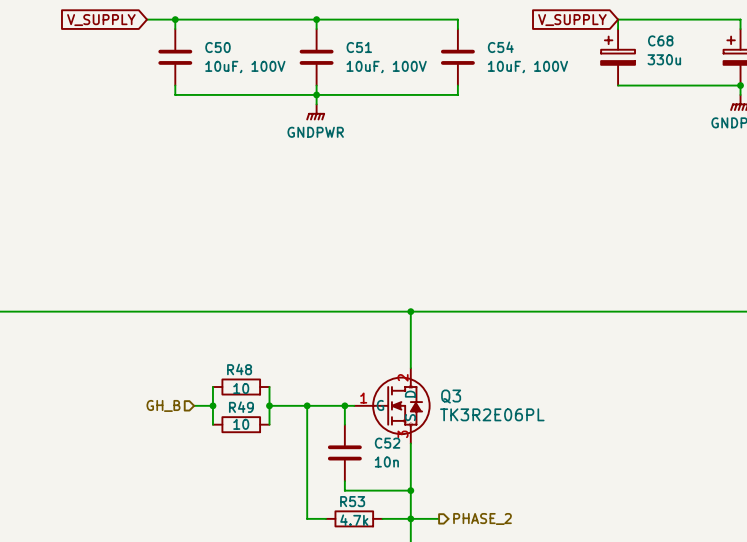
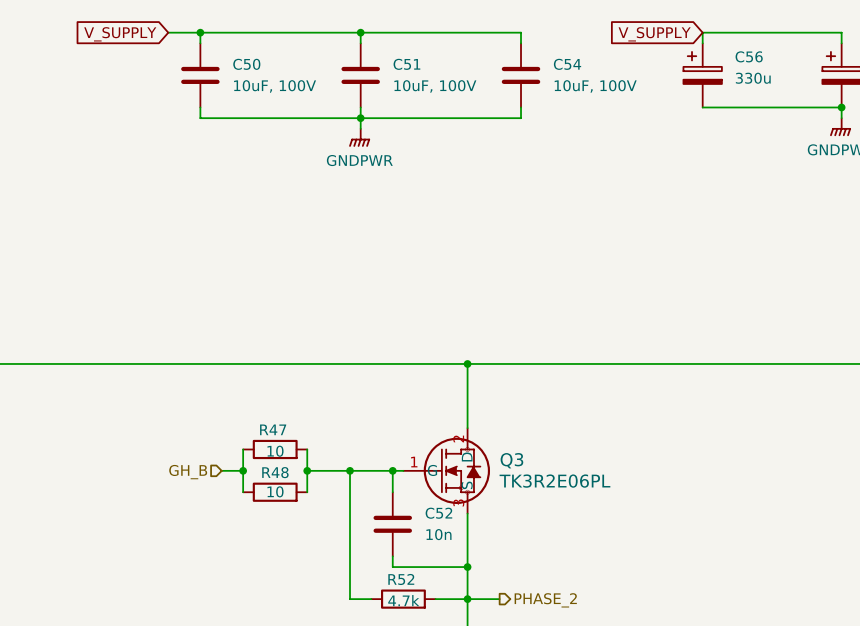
C68 name: C68 (660, 40) -> C56 (749, 56)
R48 name: R48 (239, 369) -> R47 (273, 429)
R49 name: R49 (241, 407) -> R48 (275, 472)
R53 name: R53 (352, 501) -> R52 (401, 579)

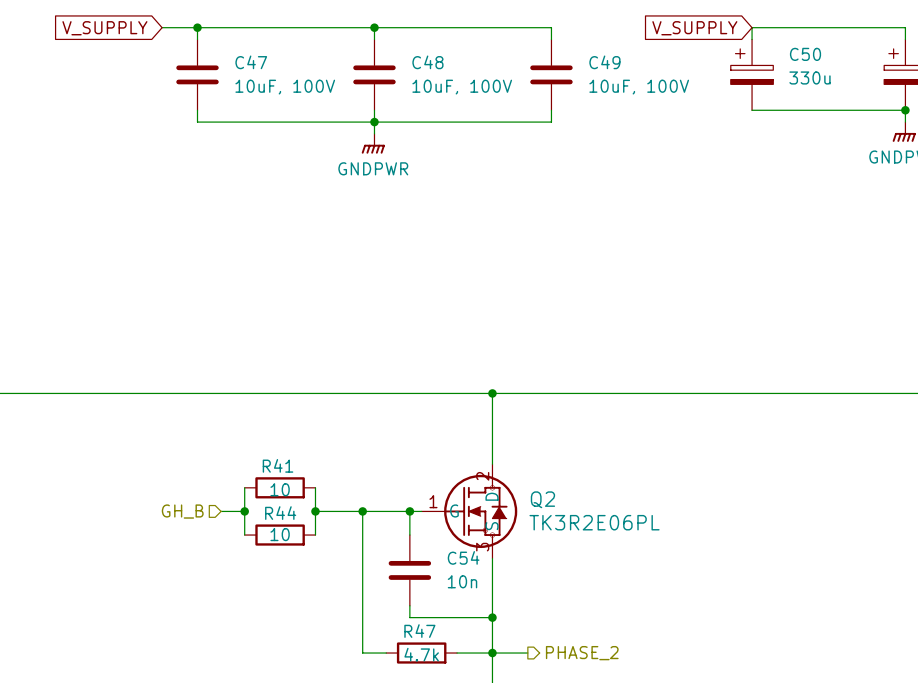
C56 name: C56 (749, 56) -> C50 (805, 54)
C50 name: C50 (246, 64) -> C47 (251, 62)
C51 name: C51 (406, 64) -> C48 (427, 62)
C54 name: C54 (567, 64) -> C49 (604, 62)
R47 name: R47 (273, 429) -> R41 (278, 465)
Q3 name: Q3 (511, 460) -> Q2 (542, 499)
R48 name: R48 (275, 472) -> R44 (280, 513)
C52 name: C52 (438, 513) -> C54 (463, 557)
R52 name: R52 (401, 579) -> R47 (419, 631)

